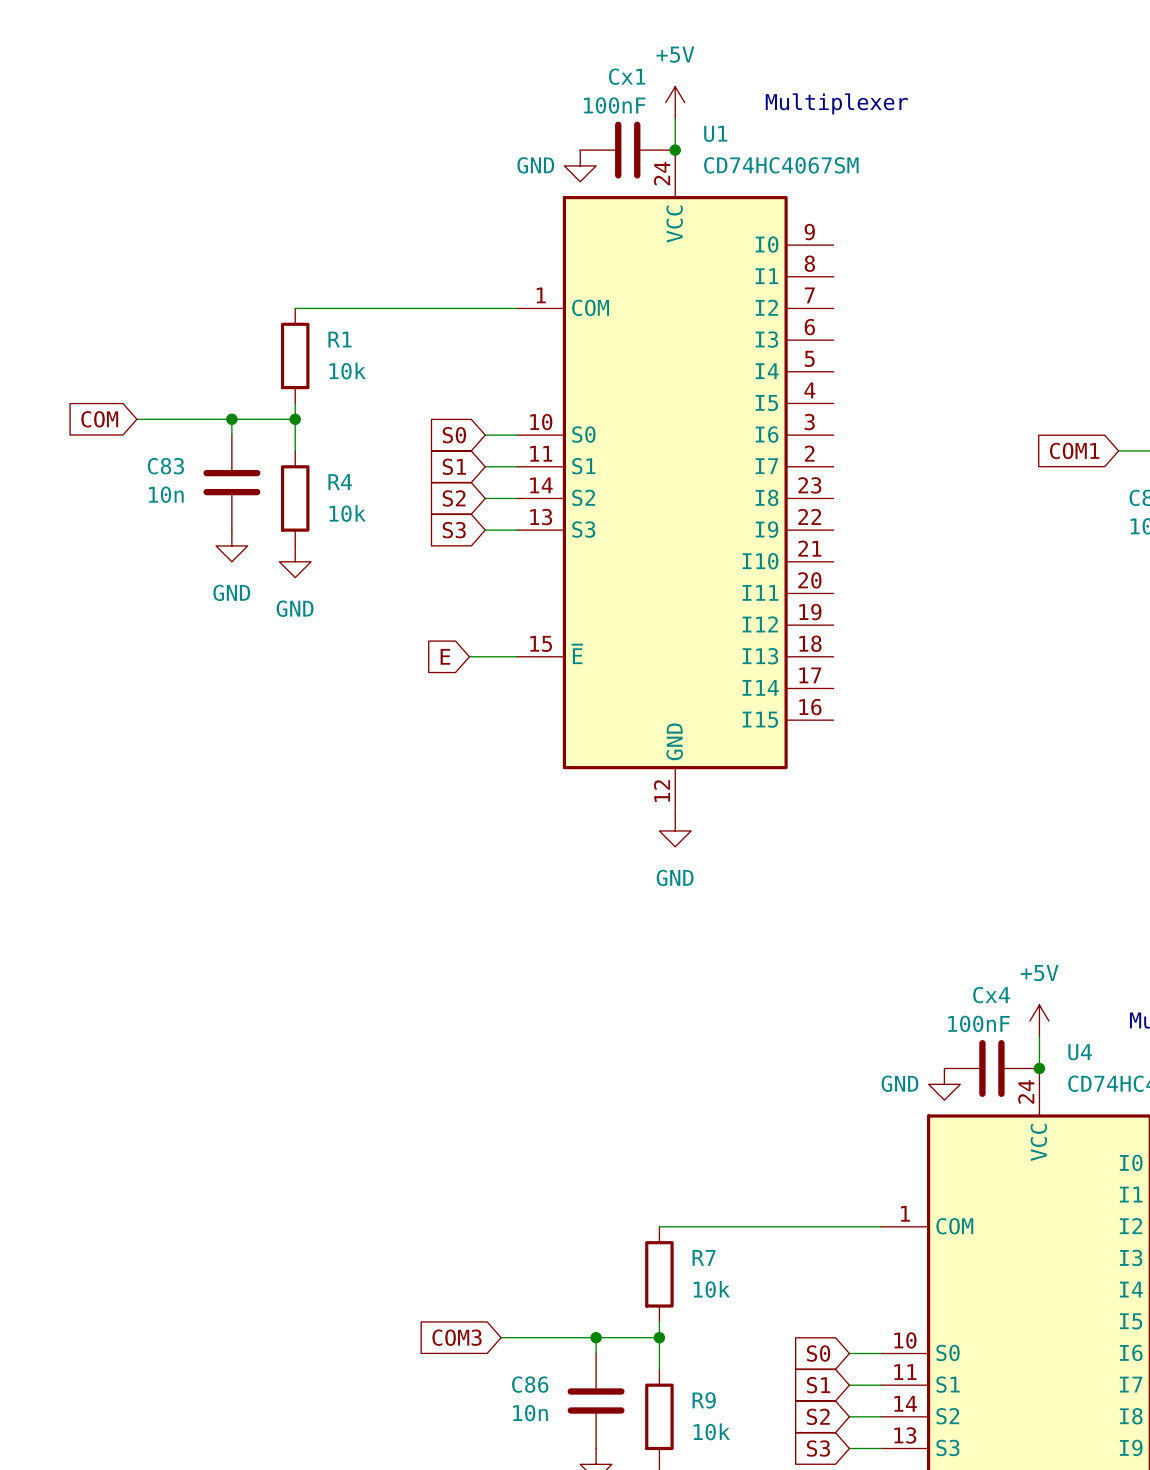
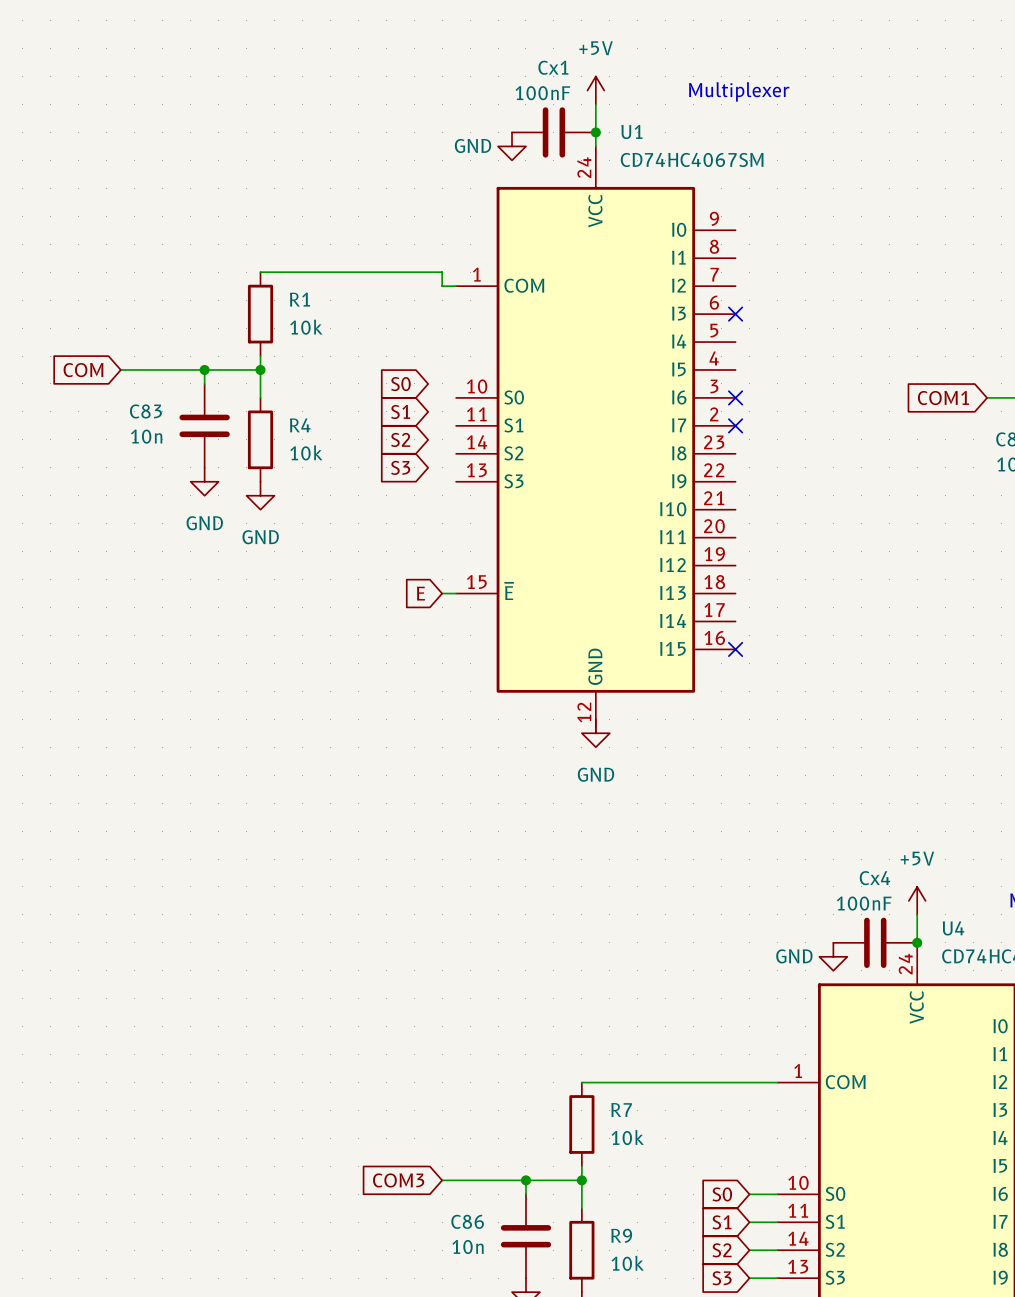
wire: (501, 308) (516, 308) -> (442, 272) (442, 286) (456, 286)
no-connect mark: none -> (735, 314)
wire: (485, 435) (516, 435) -> none
no-connect mark: none -> (735, 397)
wire: (485, 466) (516, 466) -> none
U1 position: (675, 482) -> (595, 439)
no-connect mark: none -> (735, 425)
wire: (485, 498) (516, 498) -> none
wire: (485, 530) (516, 530) -> none
global label position: E (445, 656) -> E (420, 593)
wire: (469, 656) (516, 656) -> none
wire: none -> (442, 593) (456, 593)
no-connect mark: none -> (735, 649)

